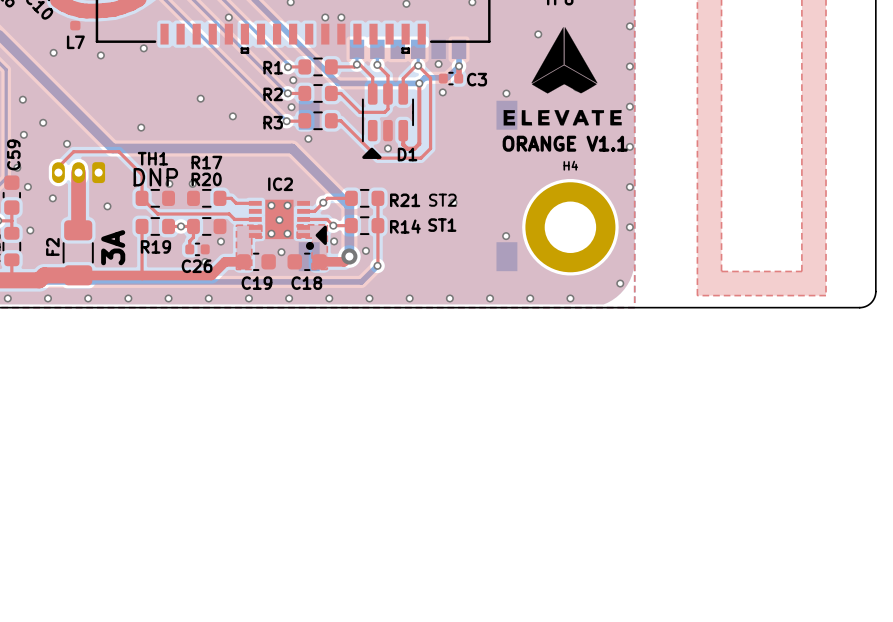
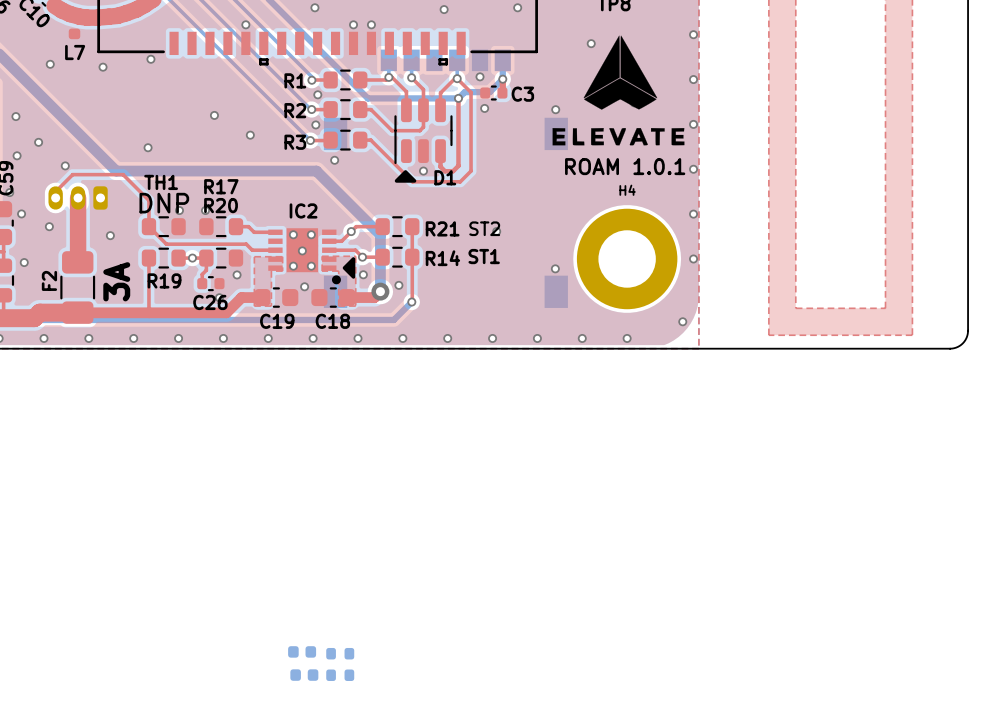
text: ORANGE V1.1 (565, 143) -> ROAM 1.0.1 (625, 166)
part: none -> (302, 651)
part: none -> (340, 653)
part: none -> (304, 675)
part: none -> (340, 675)

